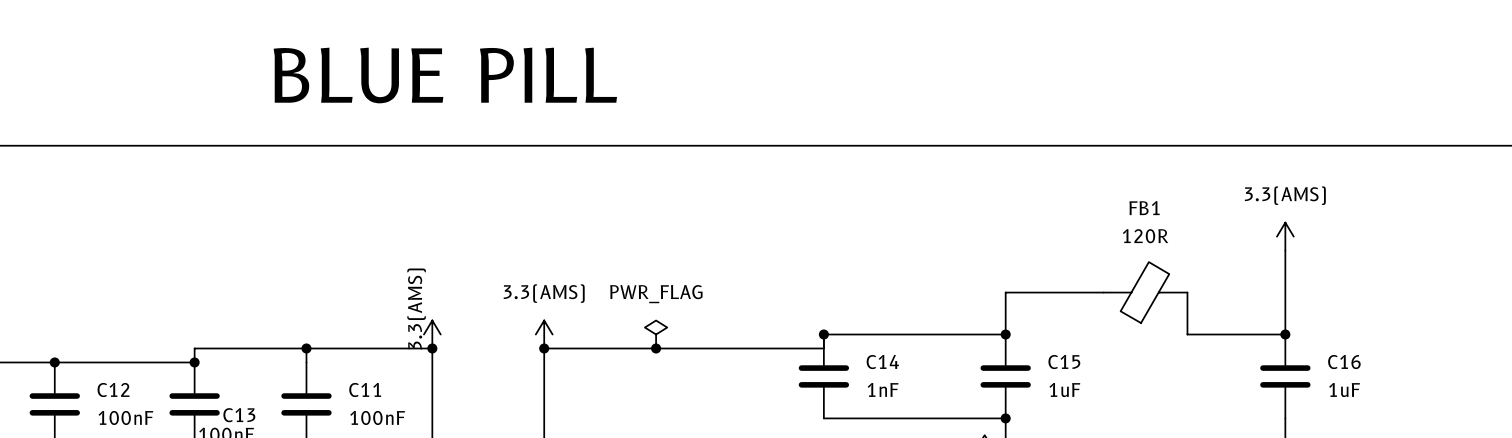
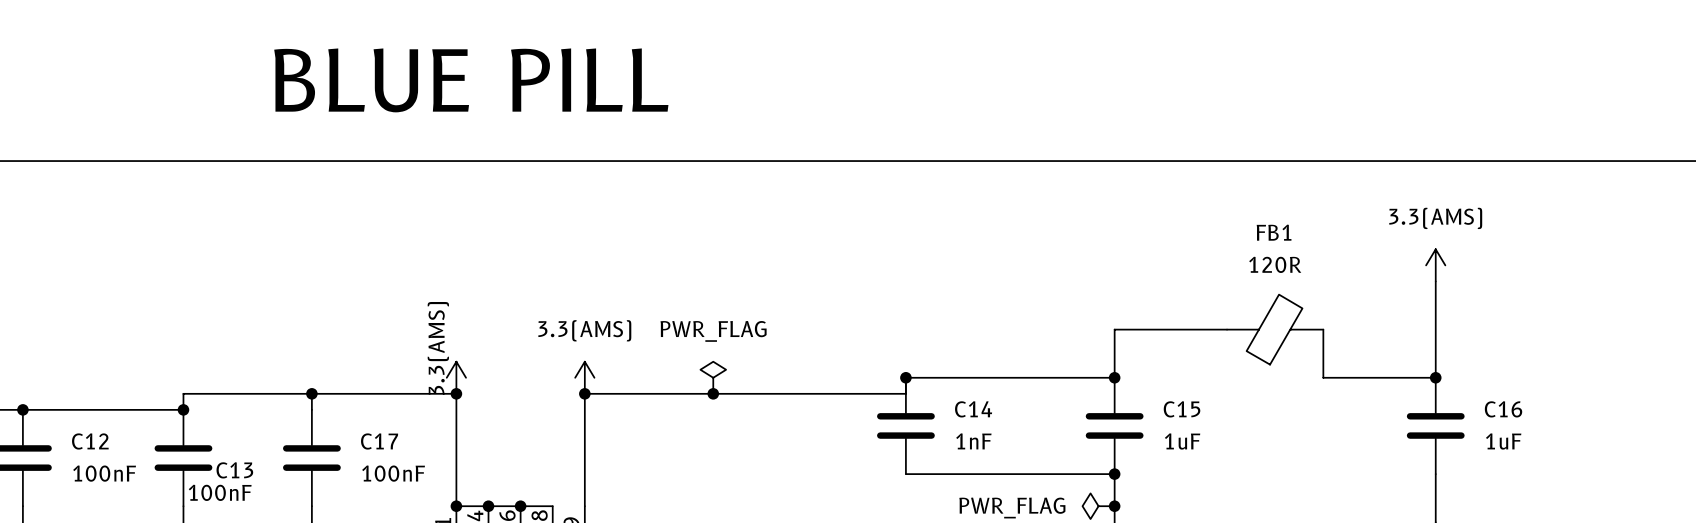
C11 name: C11 (365, 390) -> C17 (379, 441)

